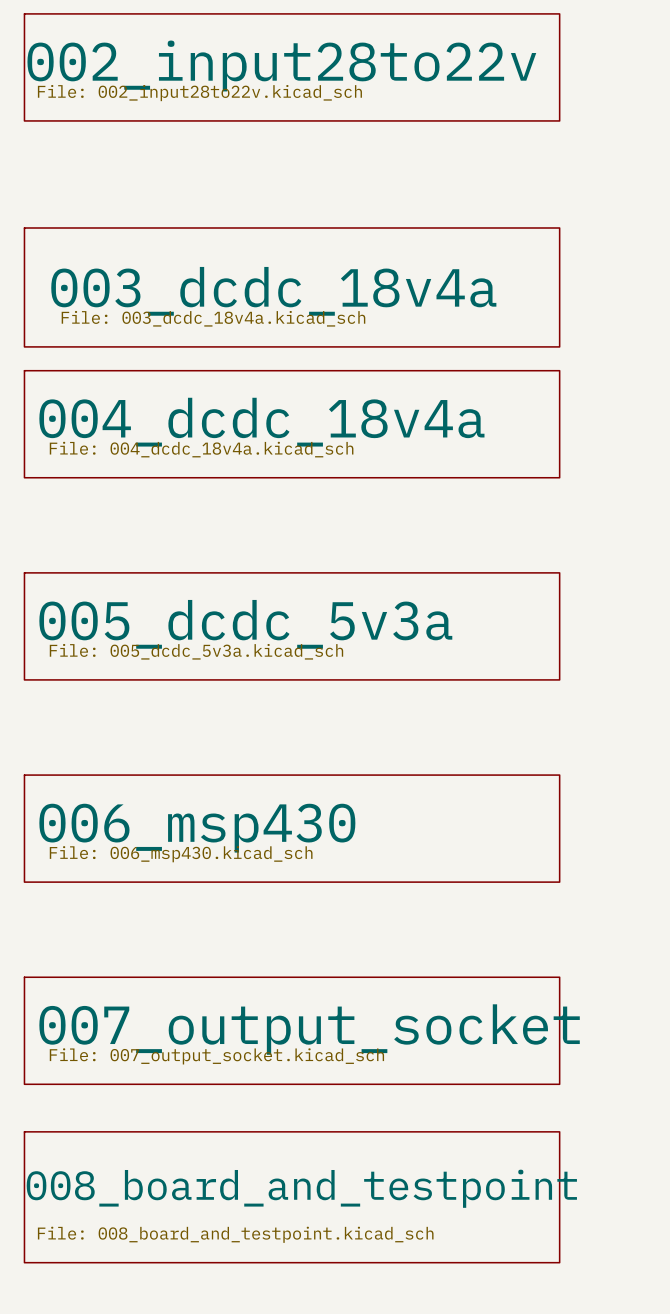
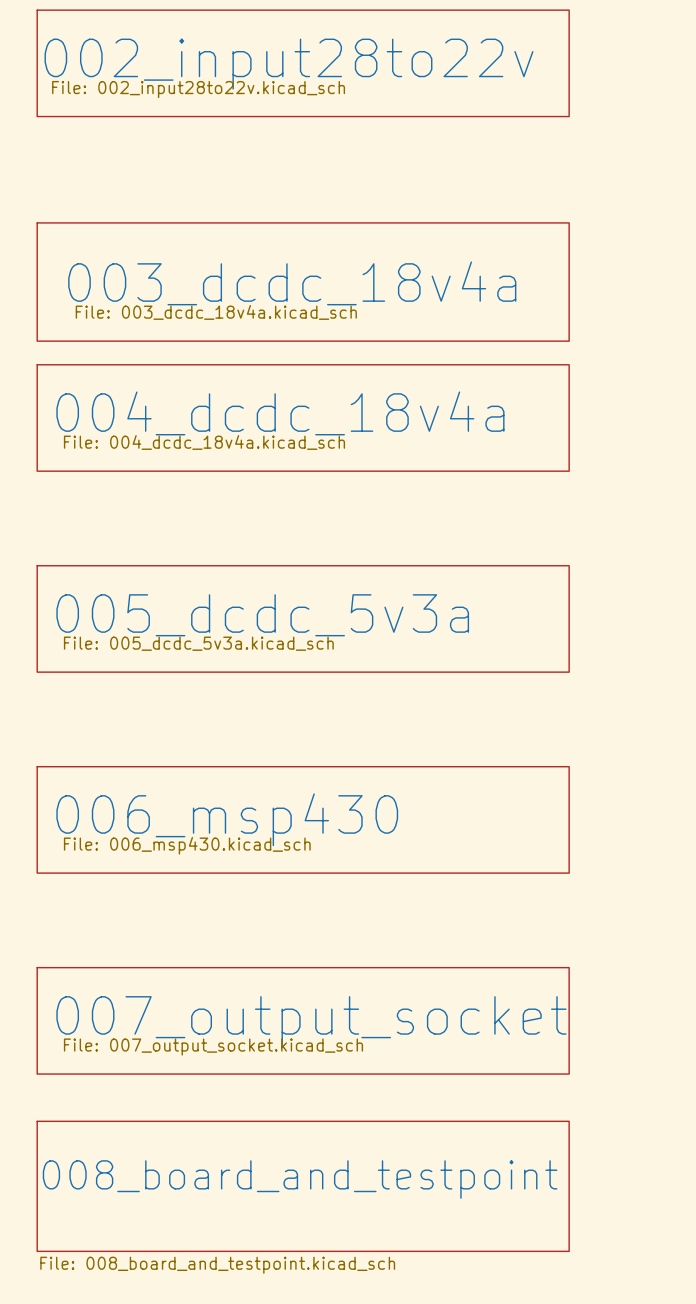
sheet 008_board_and_testpoint value position: File: 008_board_and_testpoint.kicad_sch (235, 1234) -> File: 008_board_and_testpoint.kicad_sch (217, 1265)

